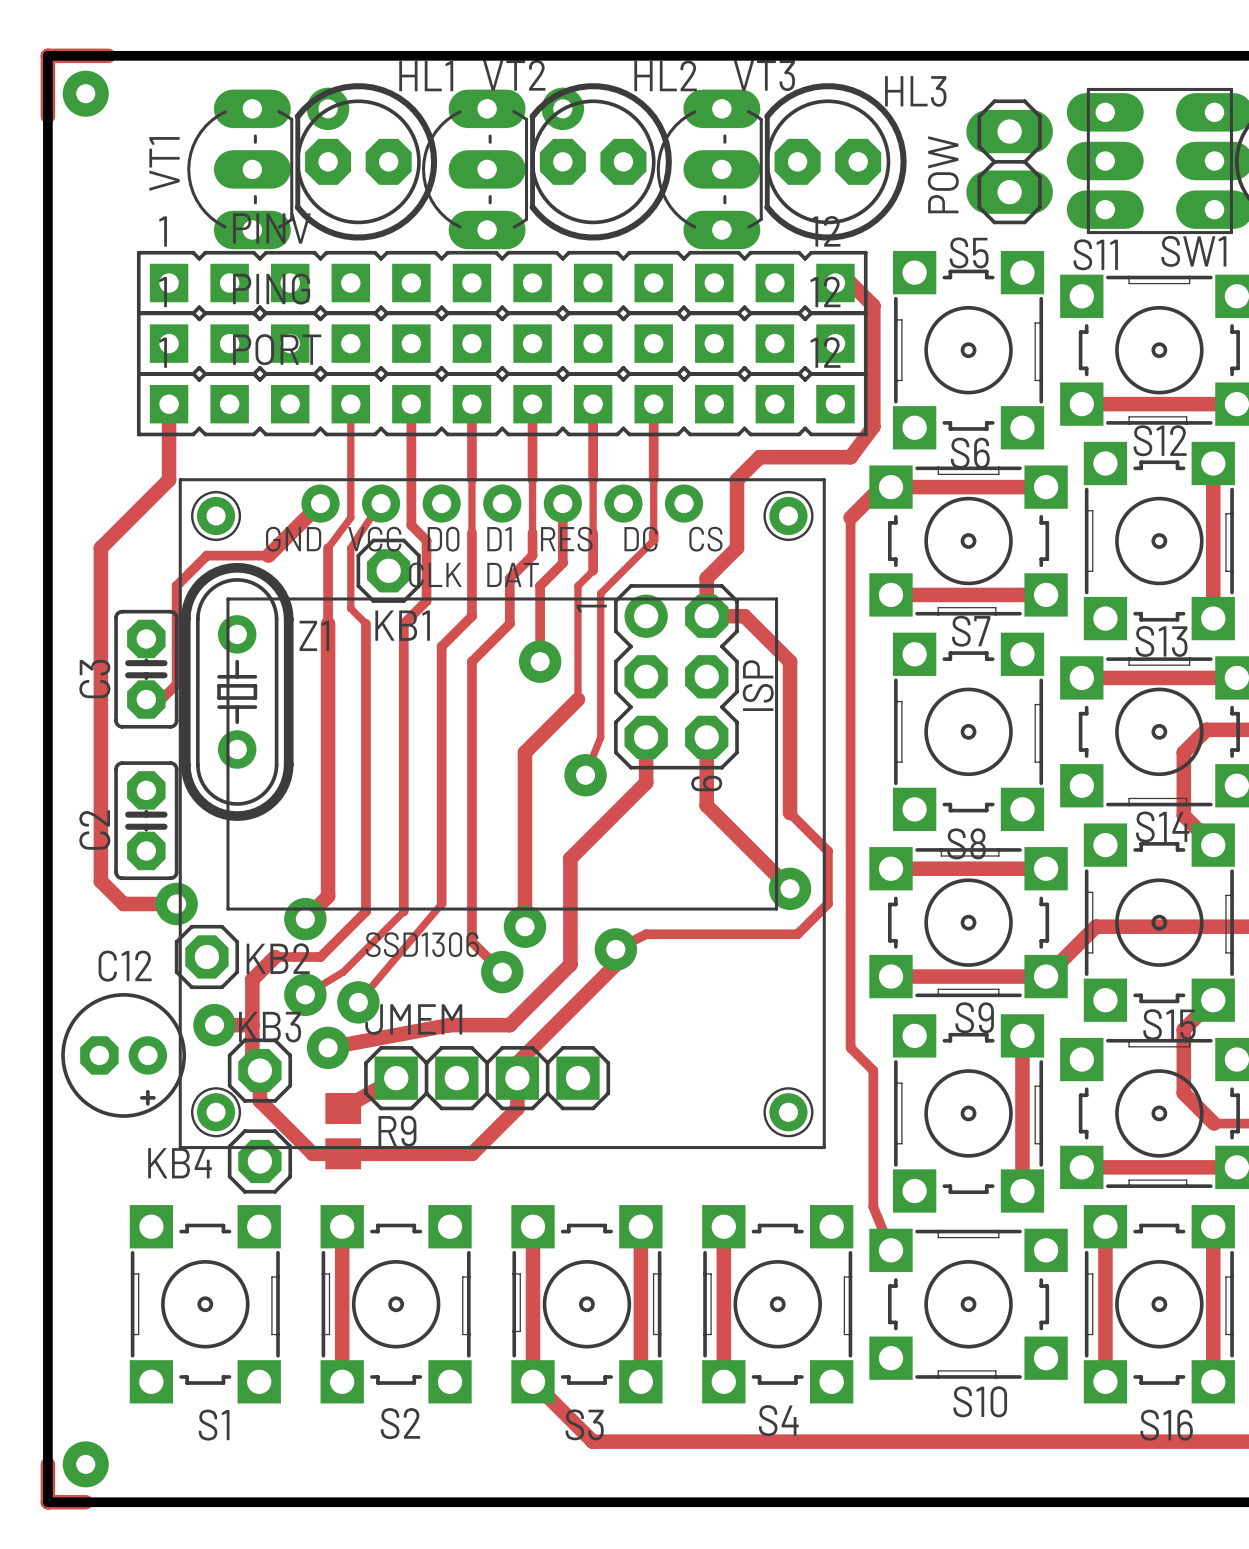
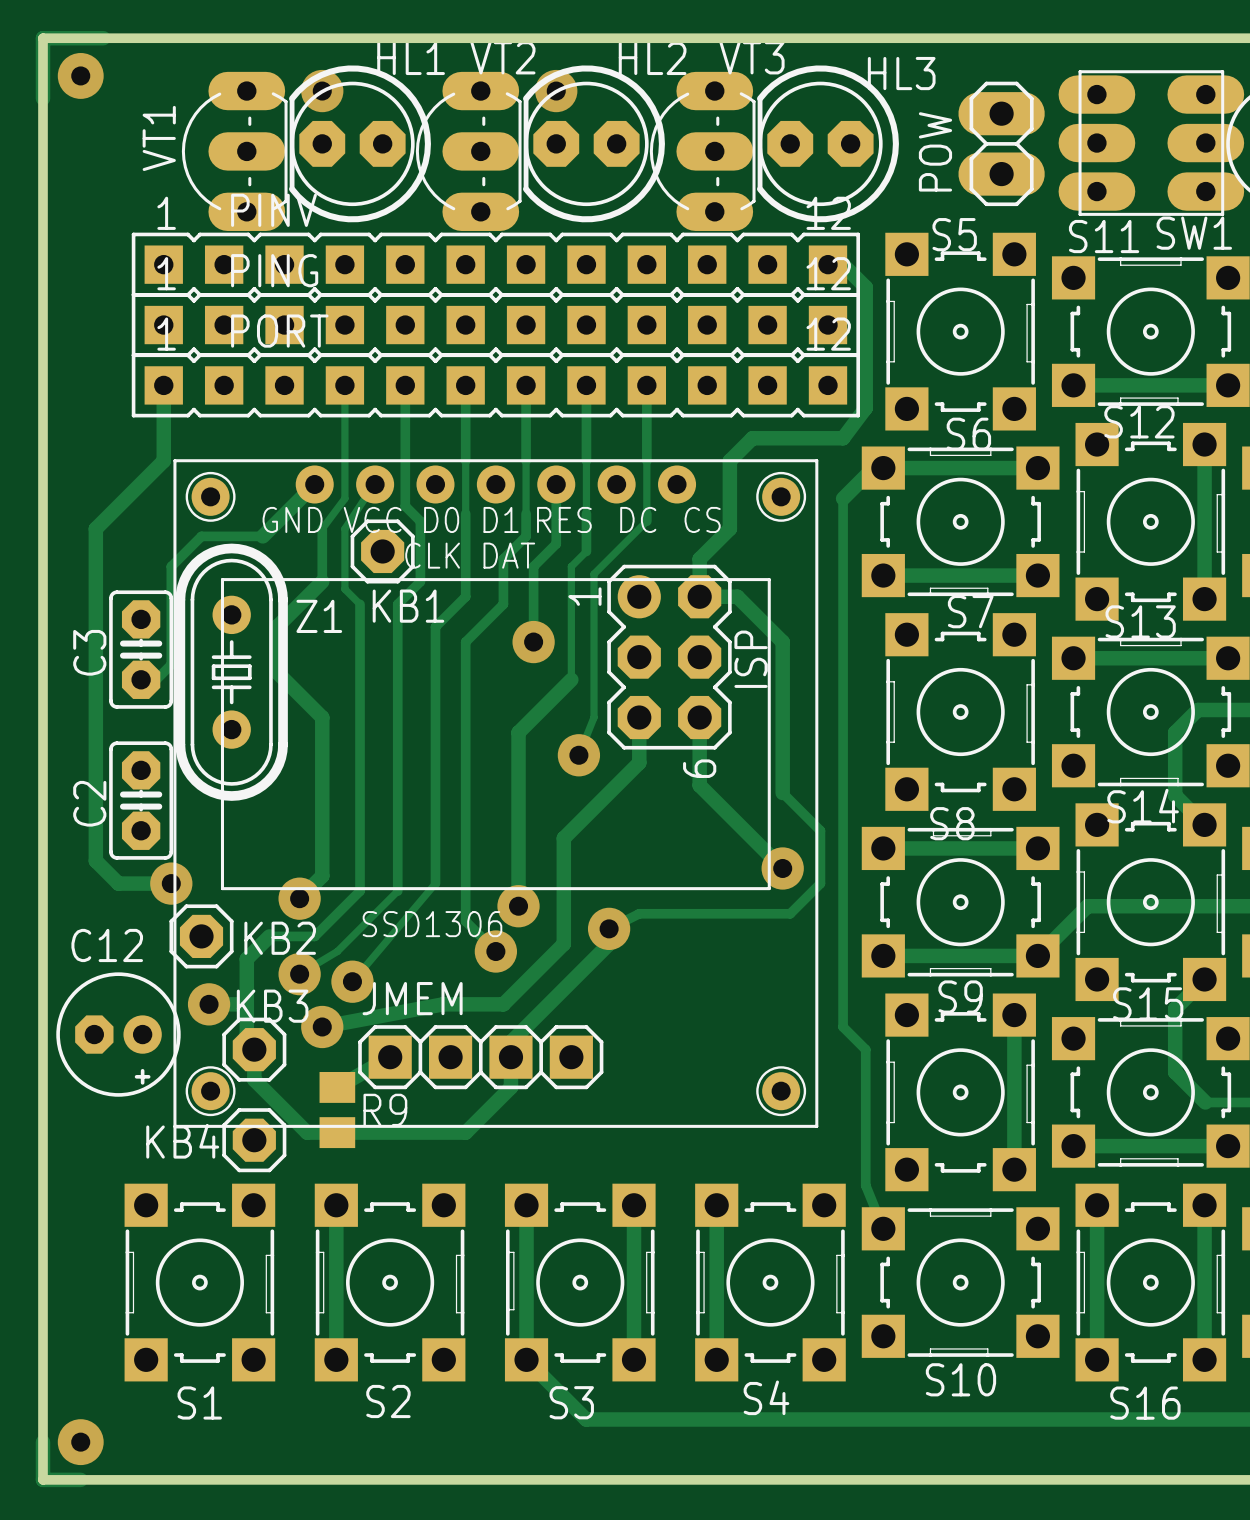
track: (328, 601) (328, 737) -> (322, 581) (276, 626) (276, 672) (322, 717)

